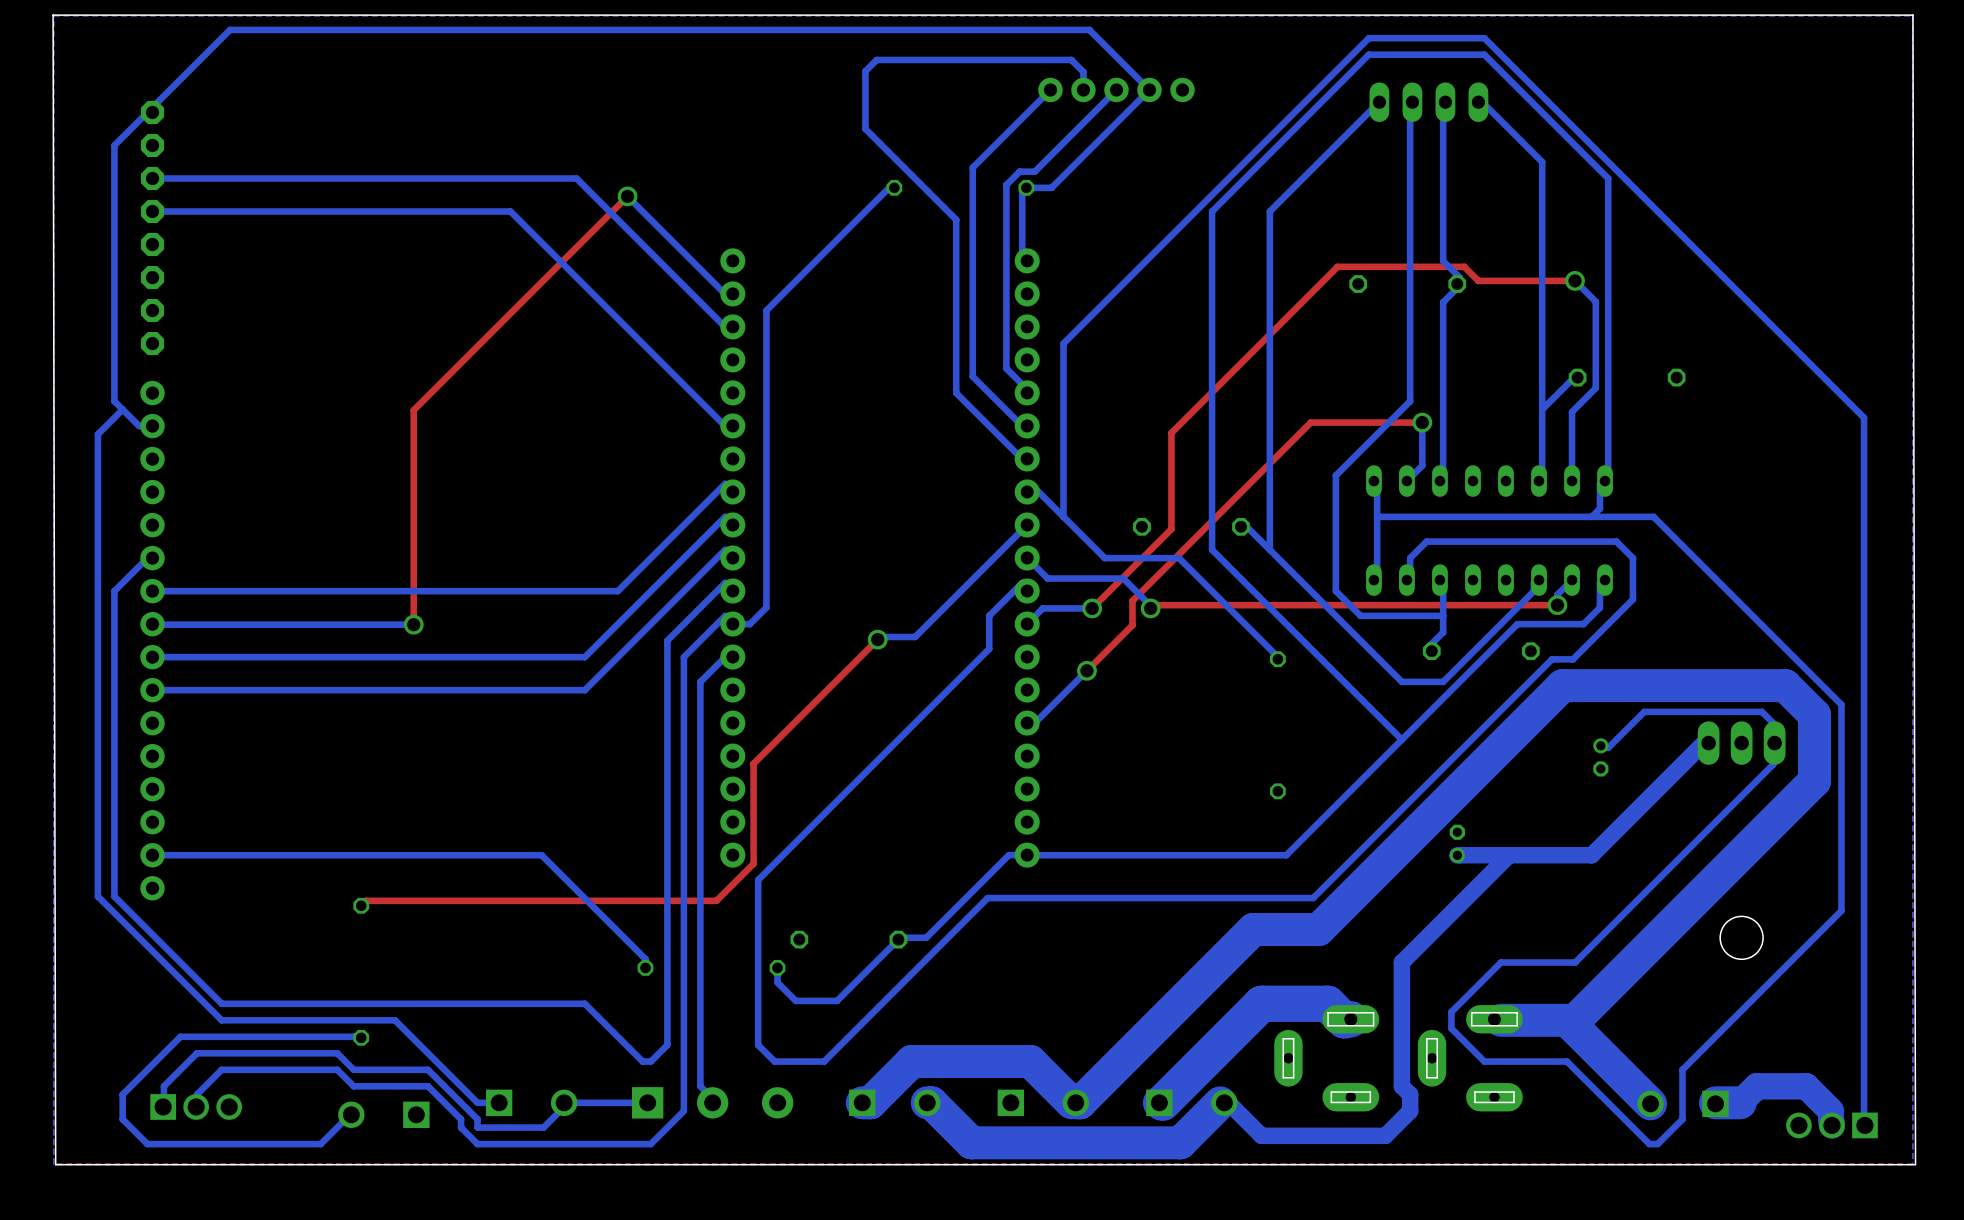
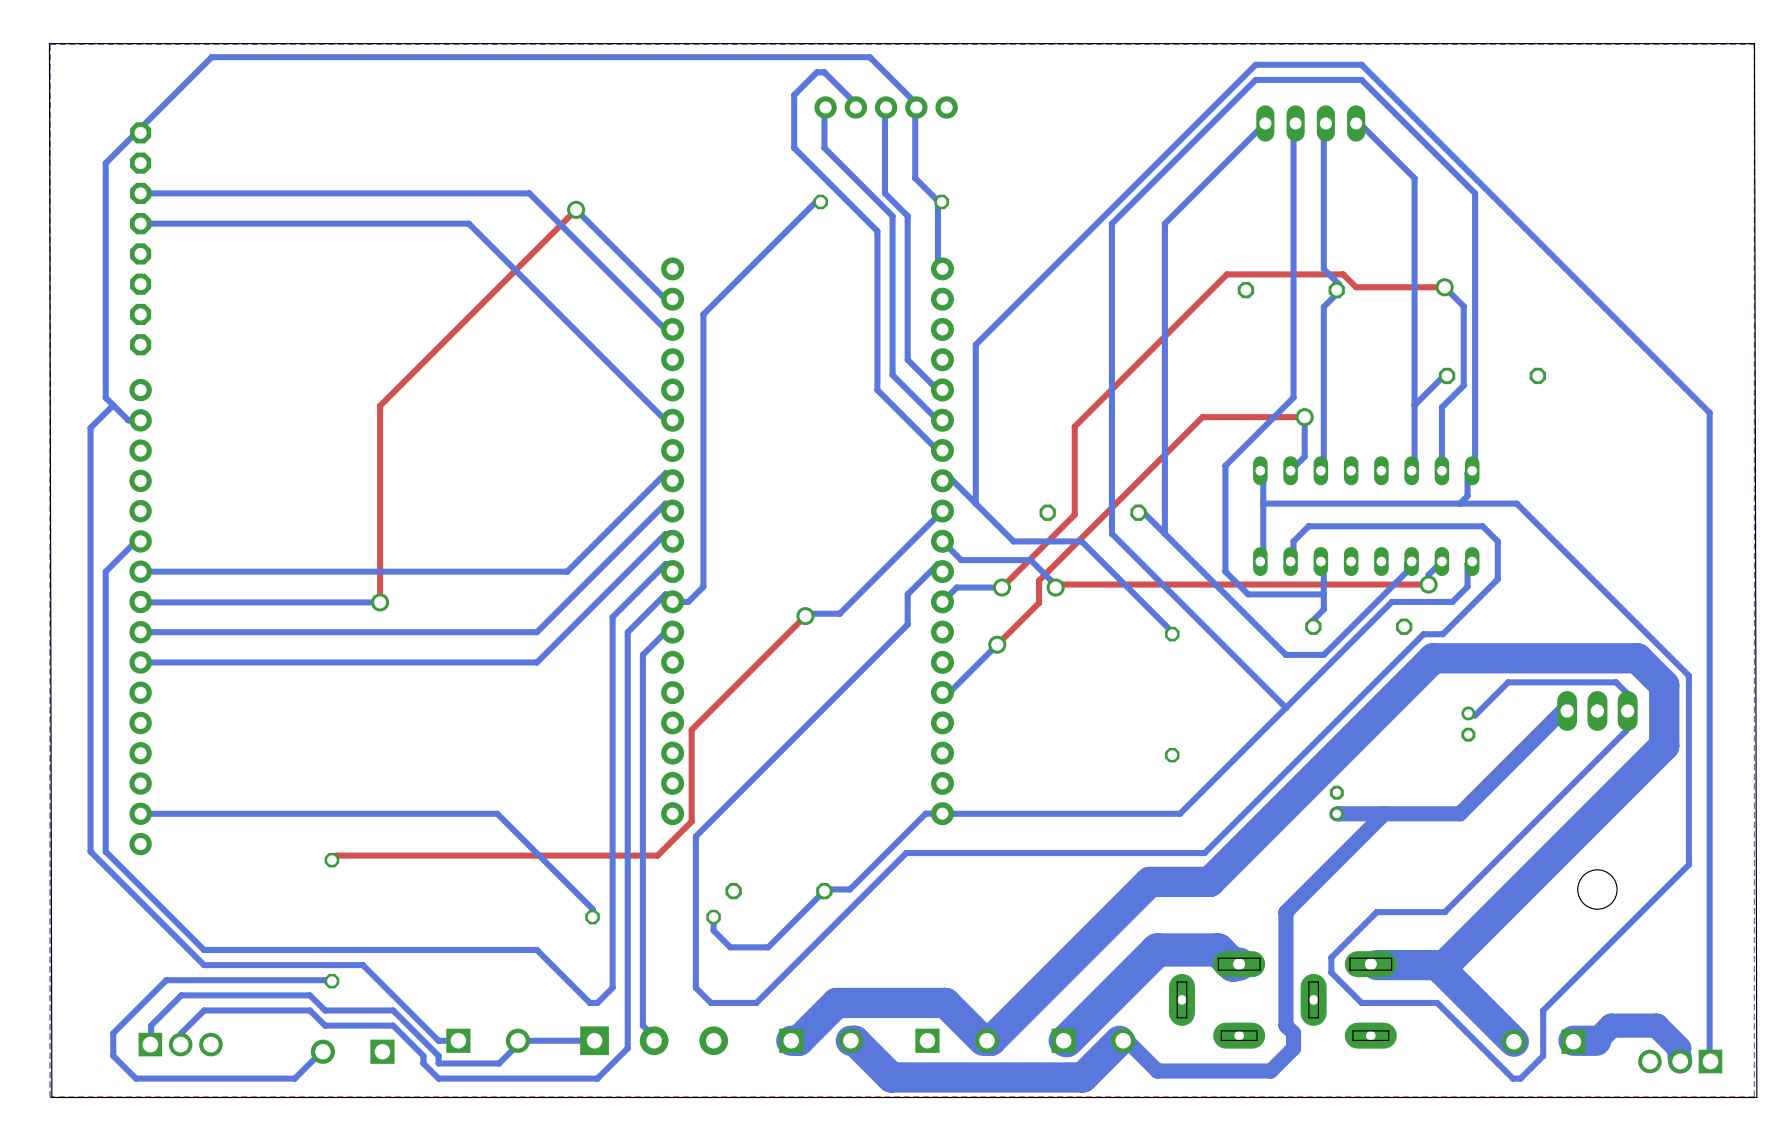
bottom track: (947, 29) (1089, 29) (1149, 89) (1051, 187) (1026, 187) -> (869, 57) (915, 102) (915, 178) (937, 200)
bottom track: (876, 59) (1071, 59) (1083, 72) (1083, 89) -> (804, 84) (816, 72) (824, 72) (854, 102) (855, 107)
bottom track: (1050, 89) (972, 167) (972, 203) -> (825, 107) (824, 148) (892, 216)
bottom track: (1116, 89) (1034, 171) (1019, 171) (1006, 184) (1006, 368) (1027, 389) (1027, 392) -> (886, 107) (884, 193) (907, 216) (907, 359) (937, 390) (942, 389)
part position: (1116, 89) -> (886, 107)

